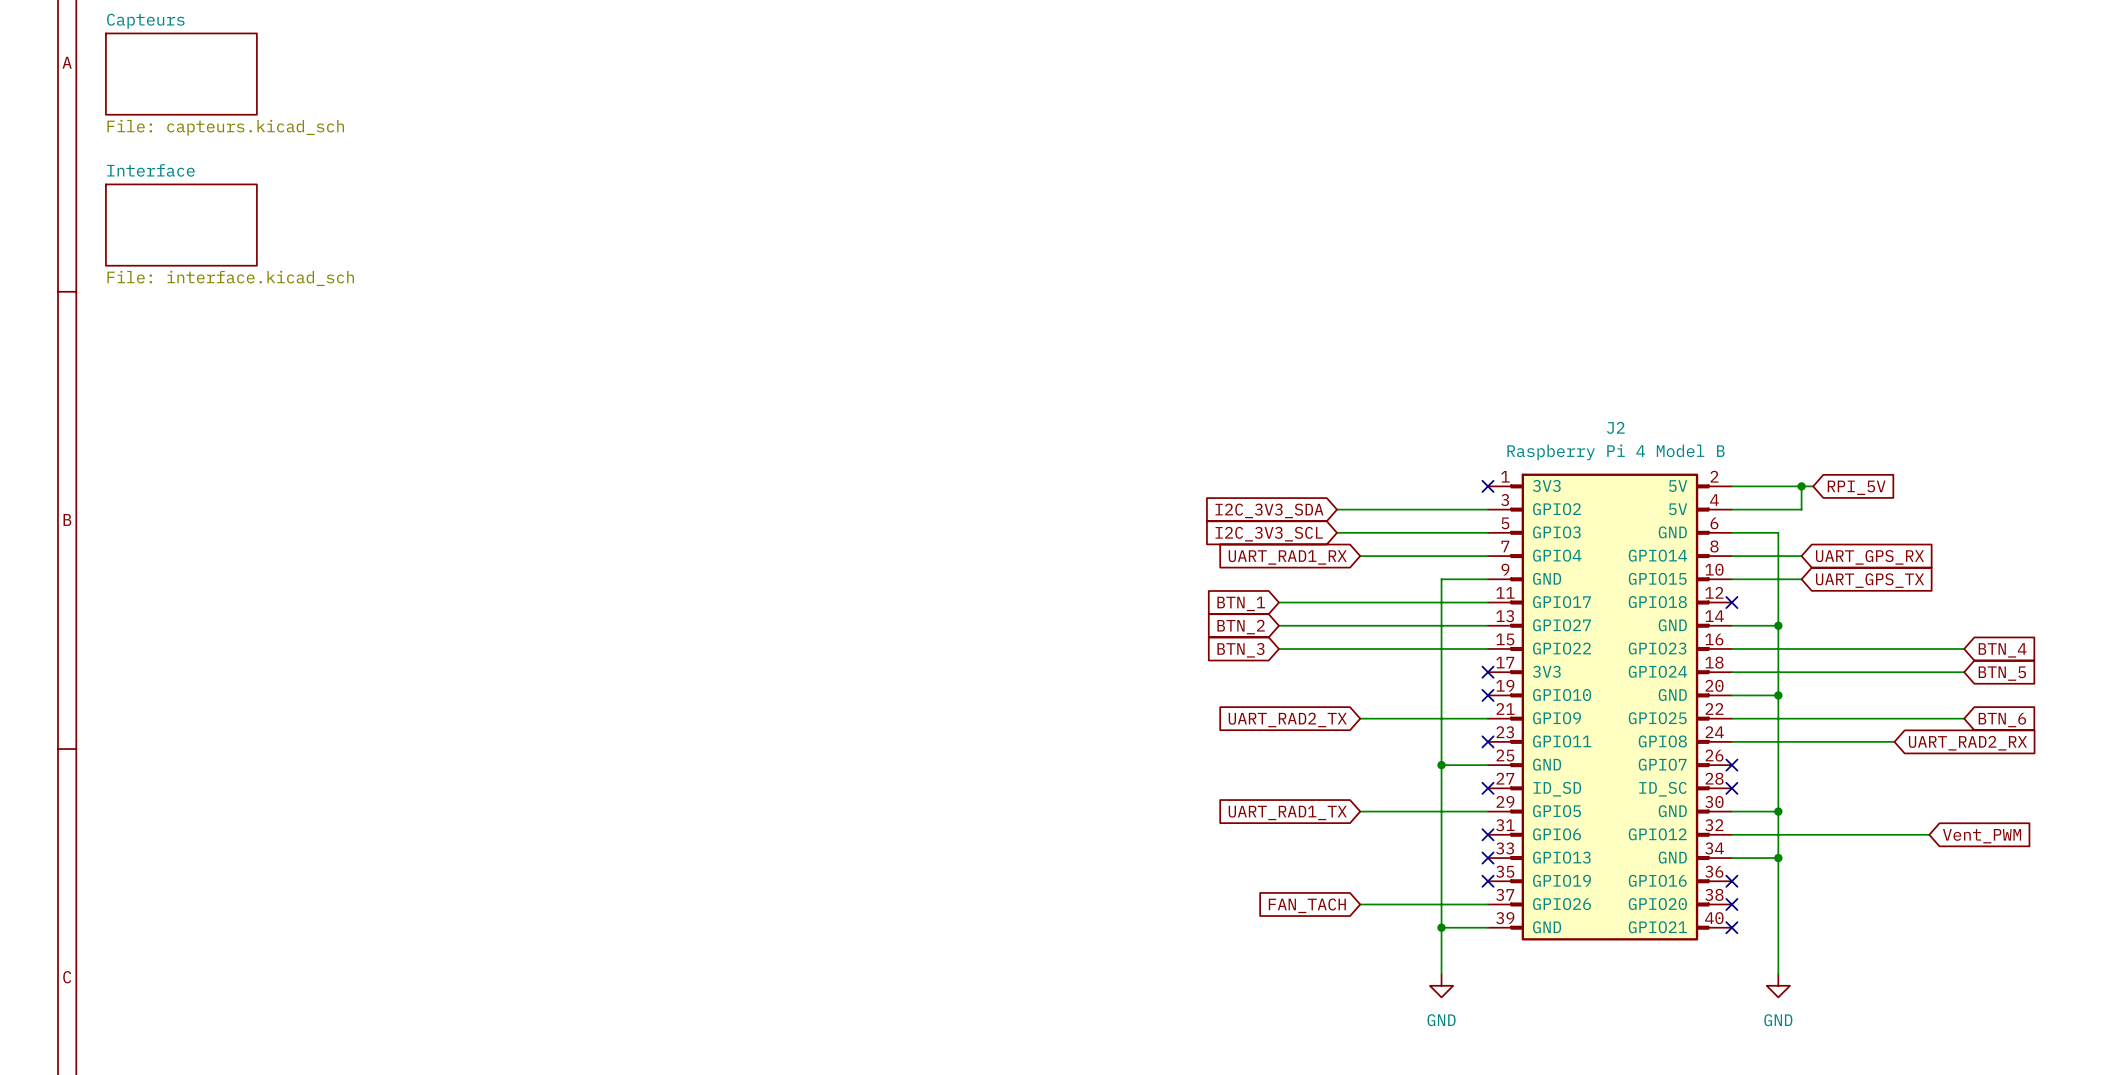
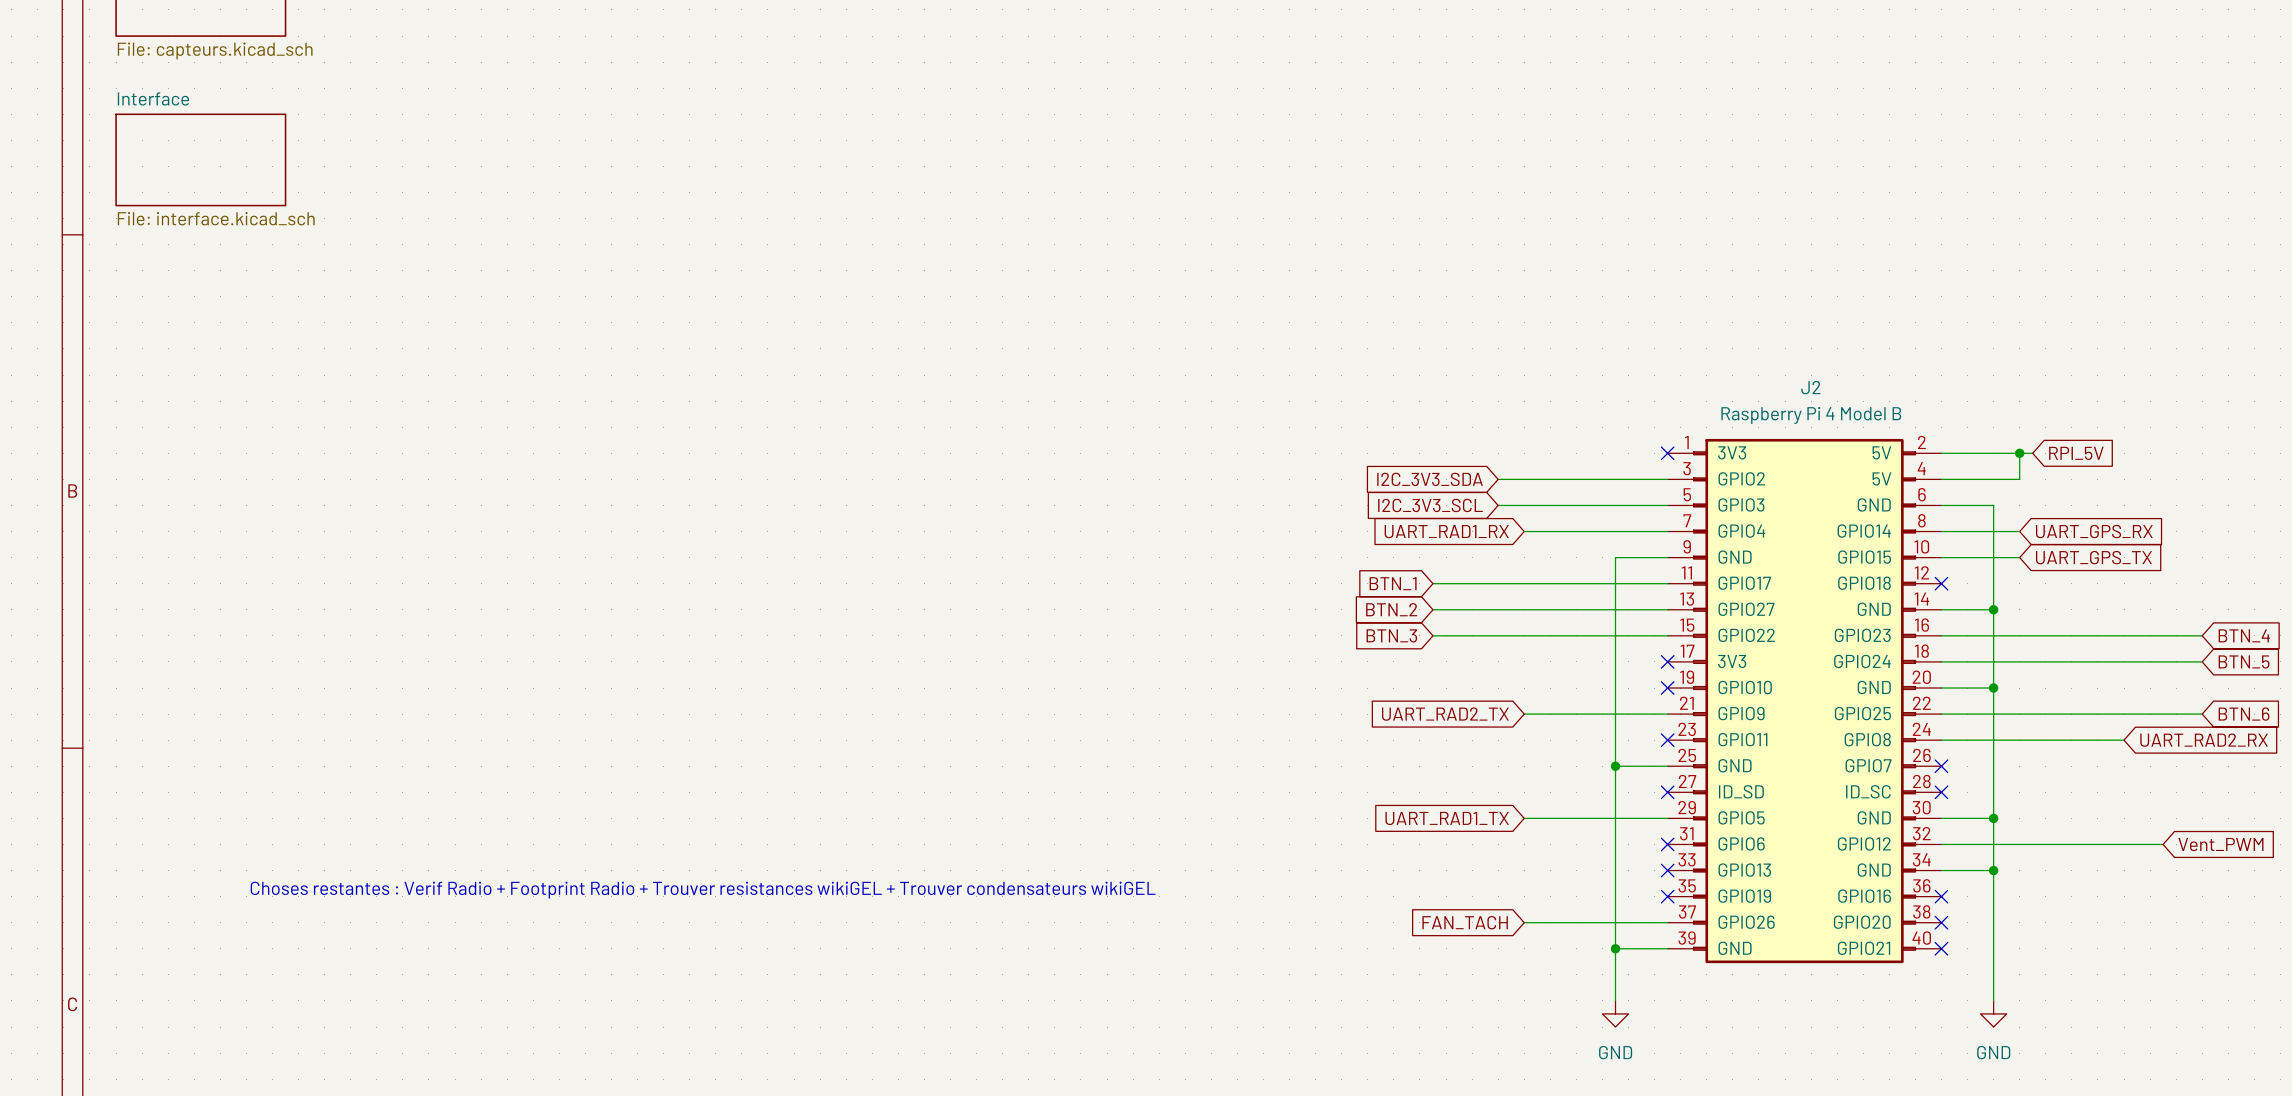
text: none -> Choses restantes : Verif Radio + Footprint Radio + Trouver resistances wikiGEL + Trouver condensateurs wikiGEL (703, 890)

